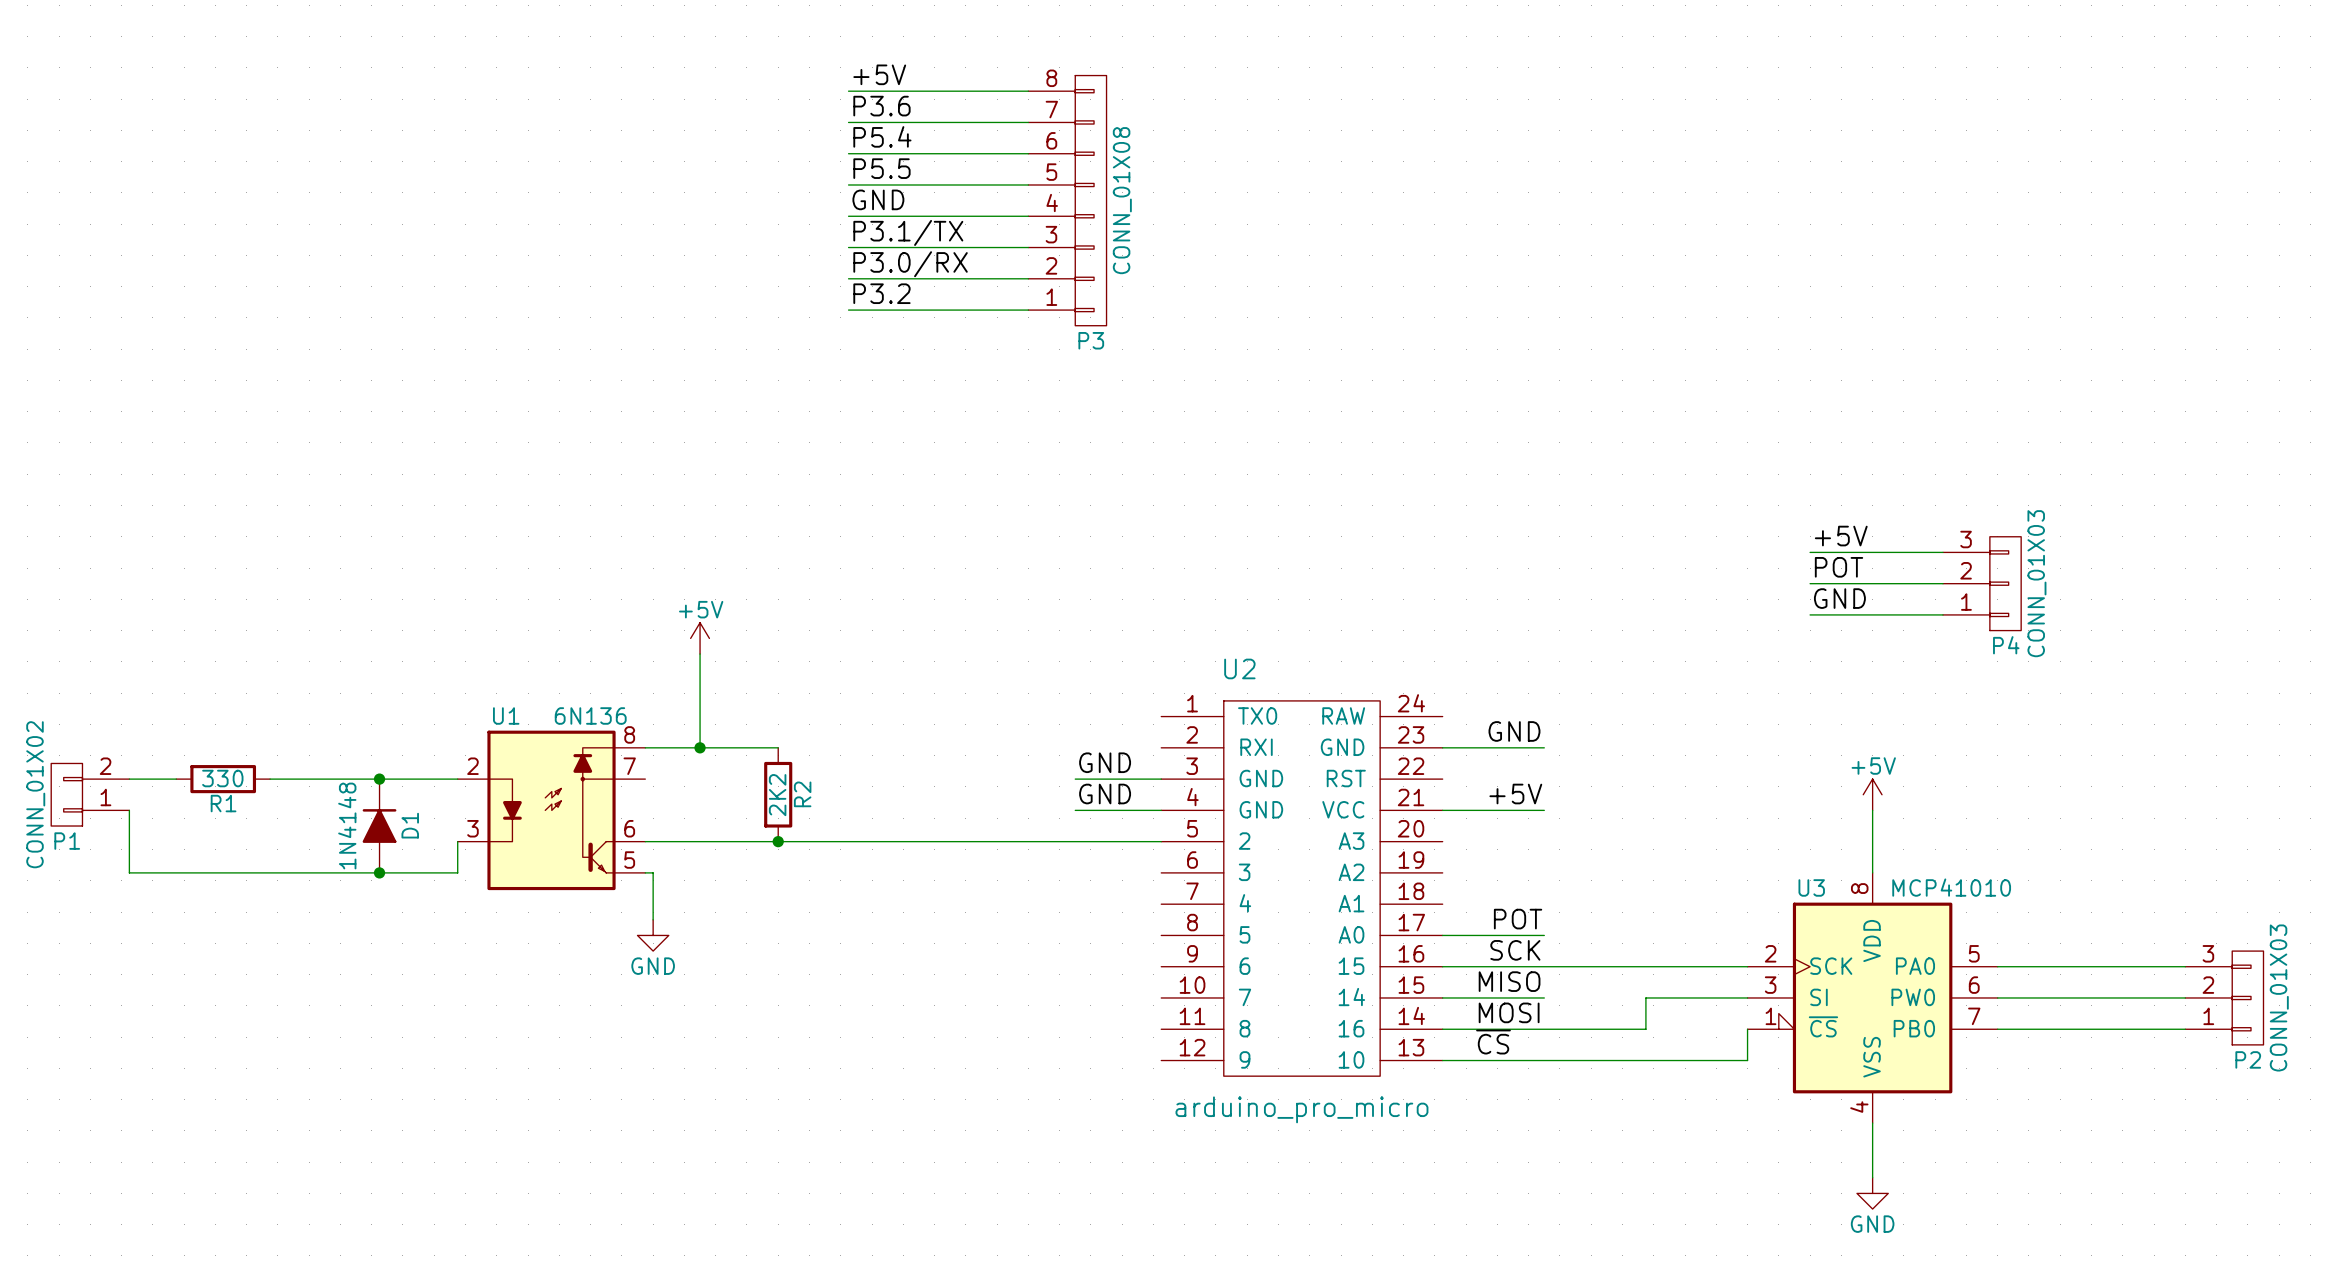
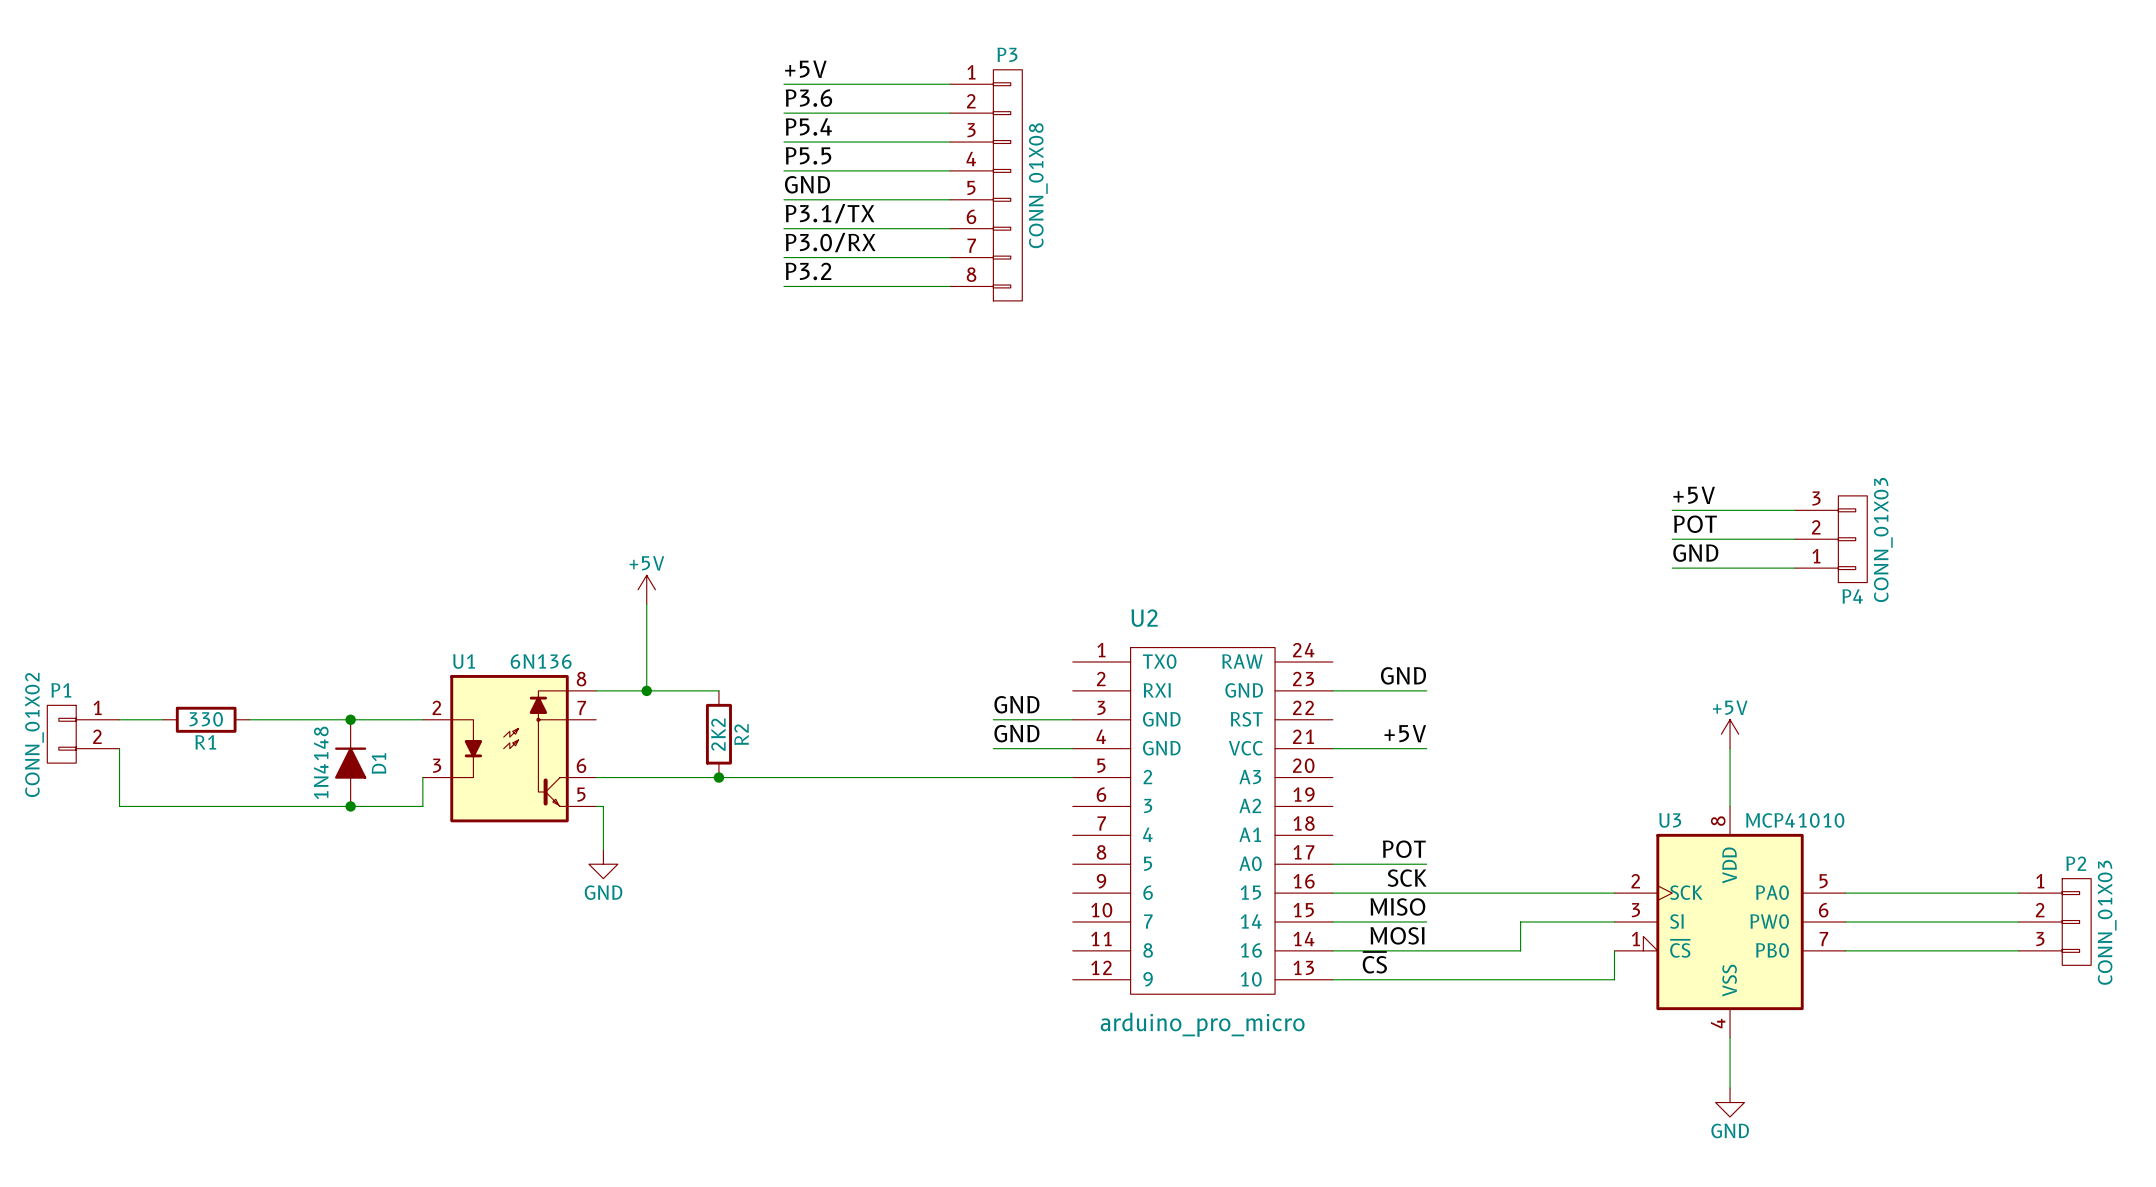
P3 flip: as is (1090, 200) -> up-down (1007, 185)
P1 flip: as is (66, 794) -> up-down (61, 734)
P2 flip: as is (2247, 997) -> up-down (2076, 921)

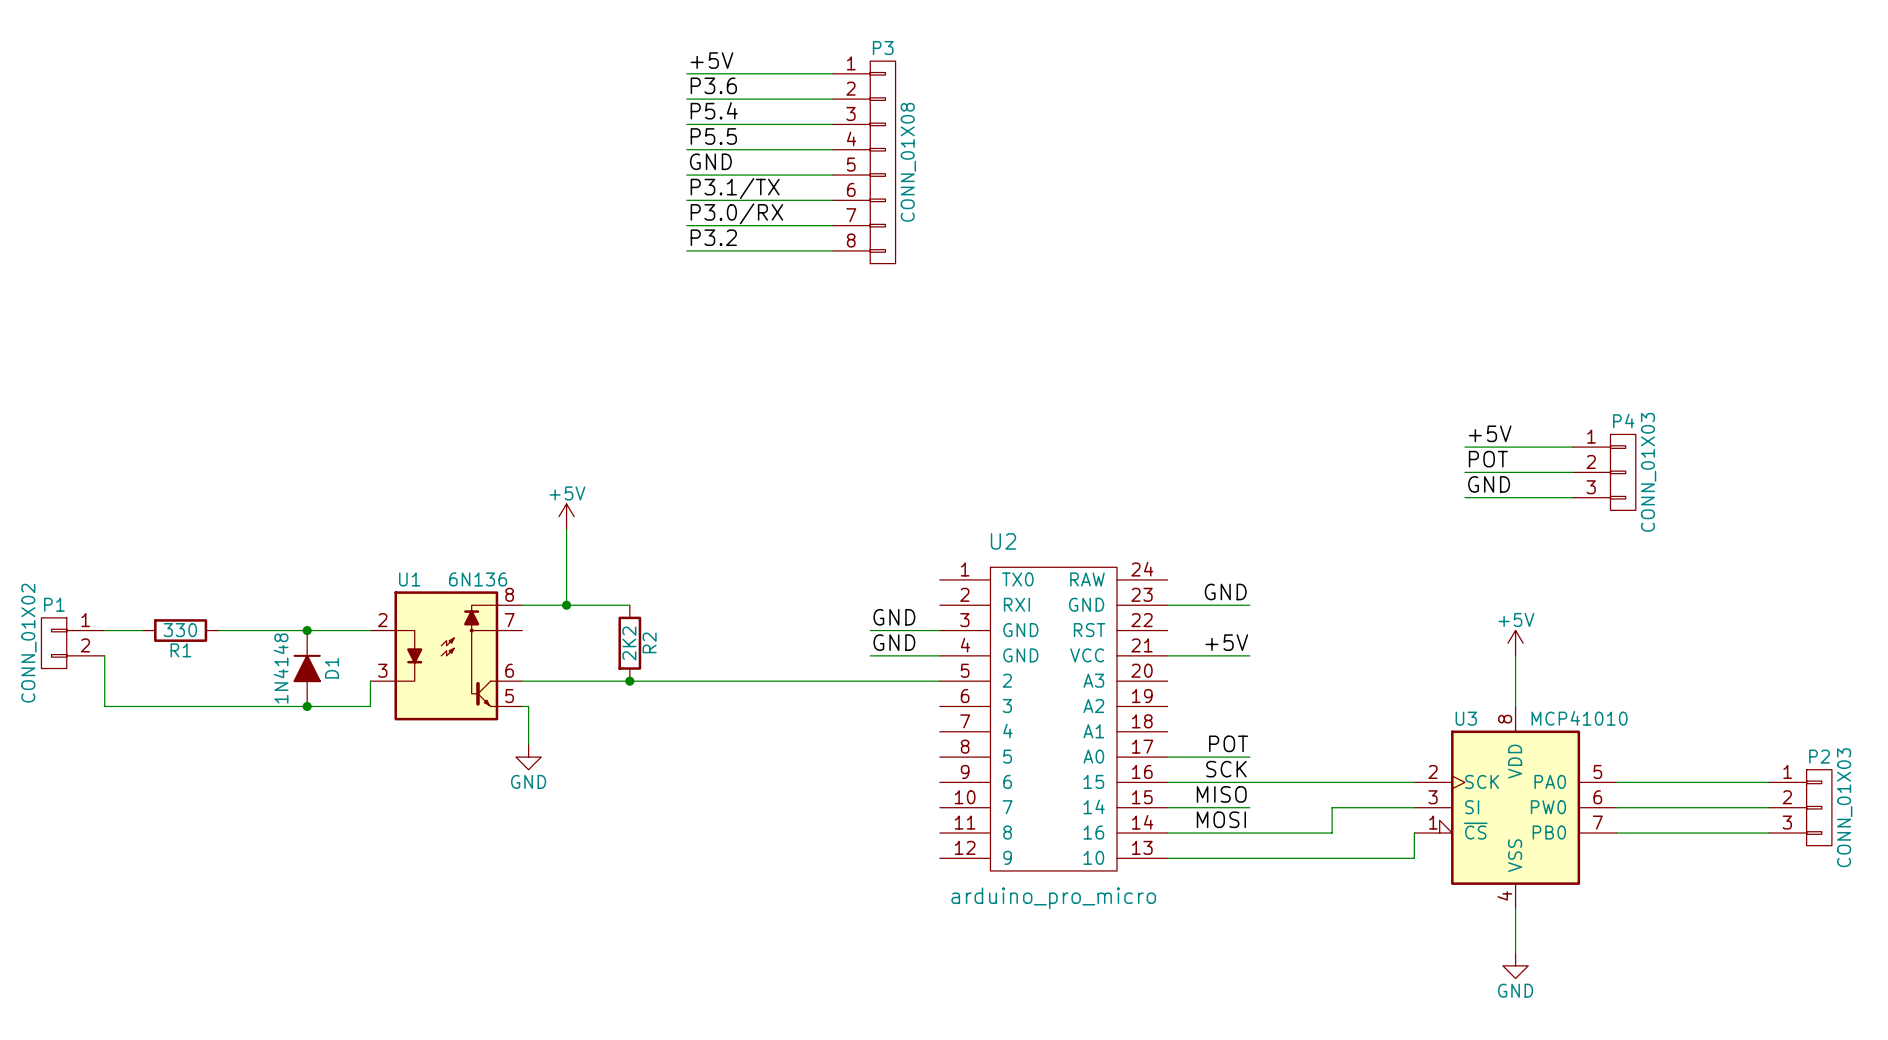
P4 flip: as is (1852, 539) -> up-down (1623, 472)
label: ~{CS} (1374, 962) -> none

